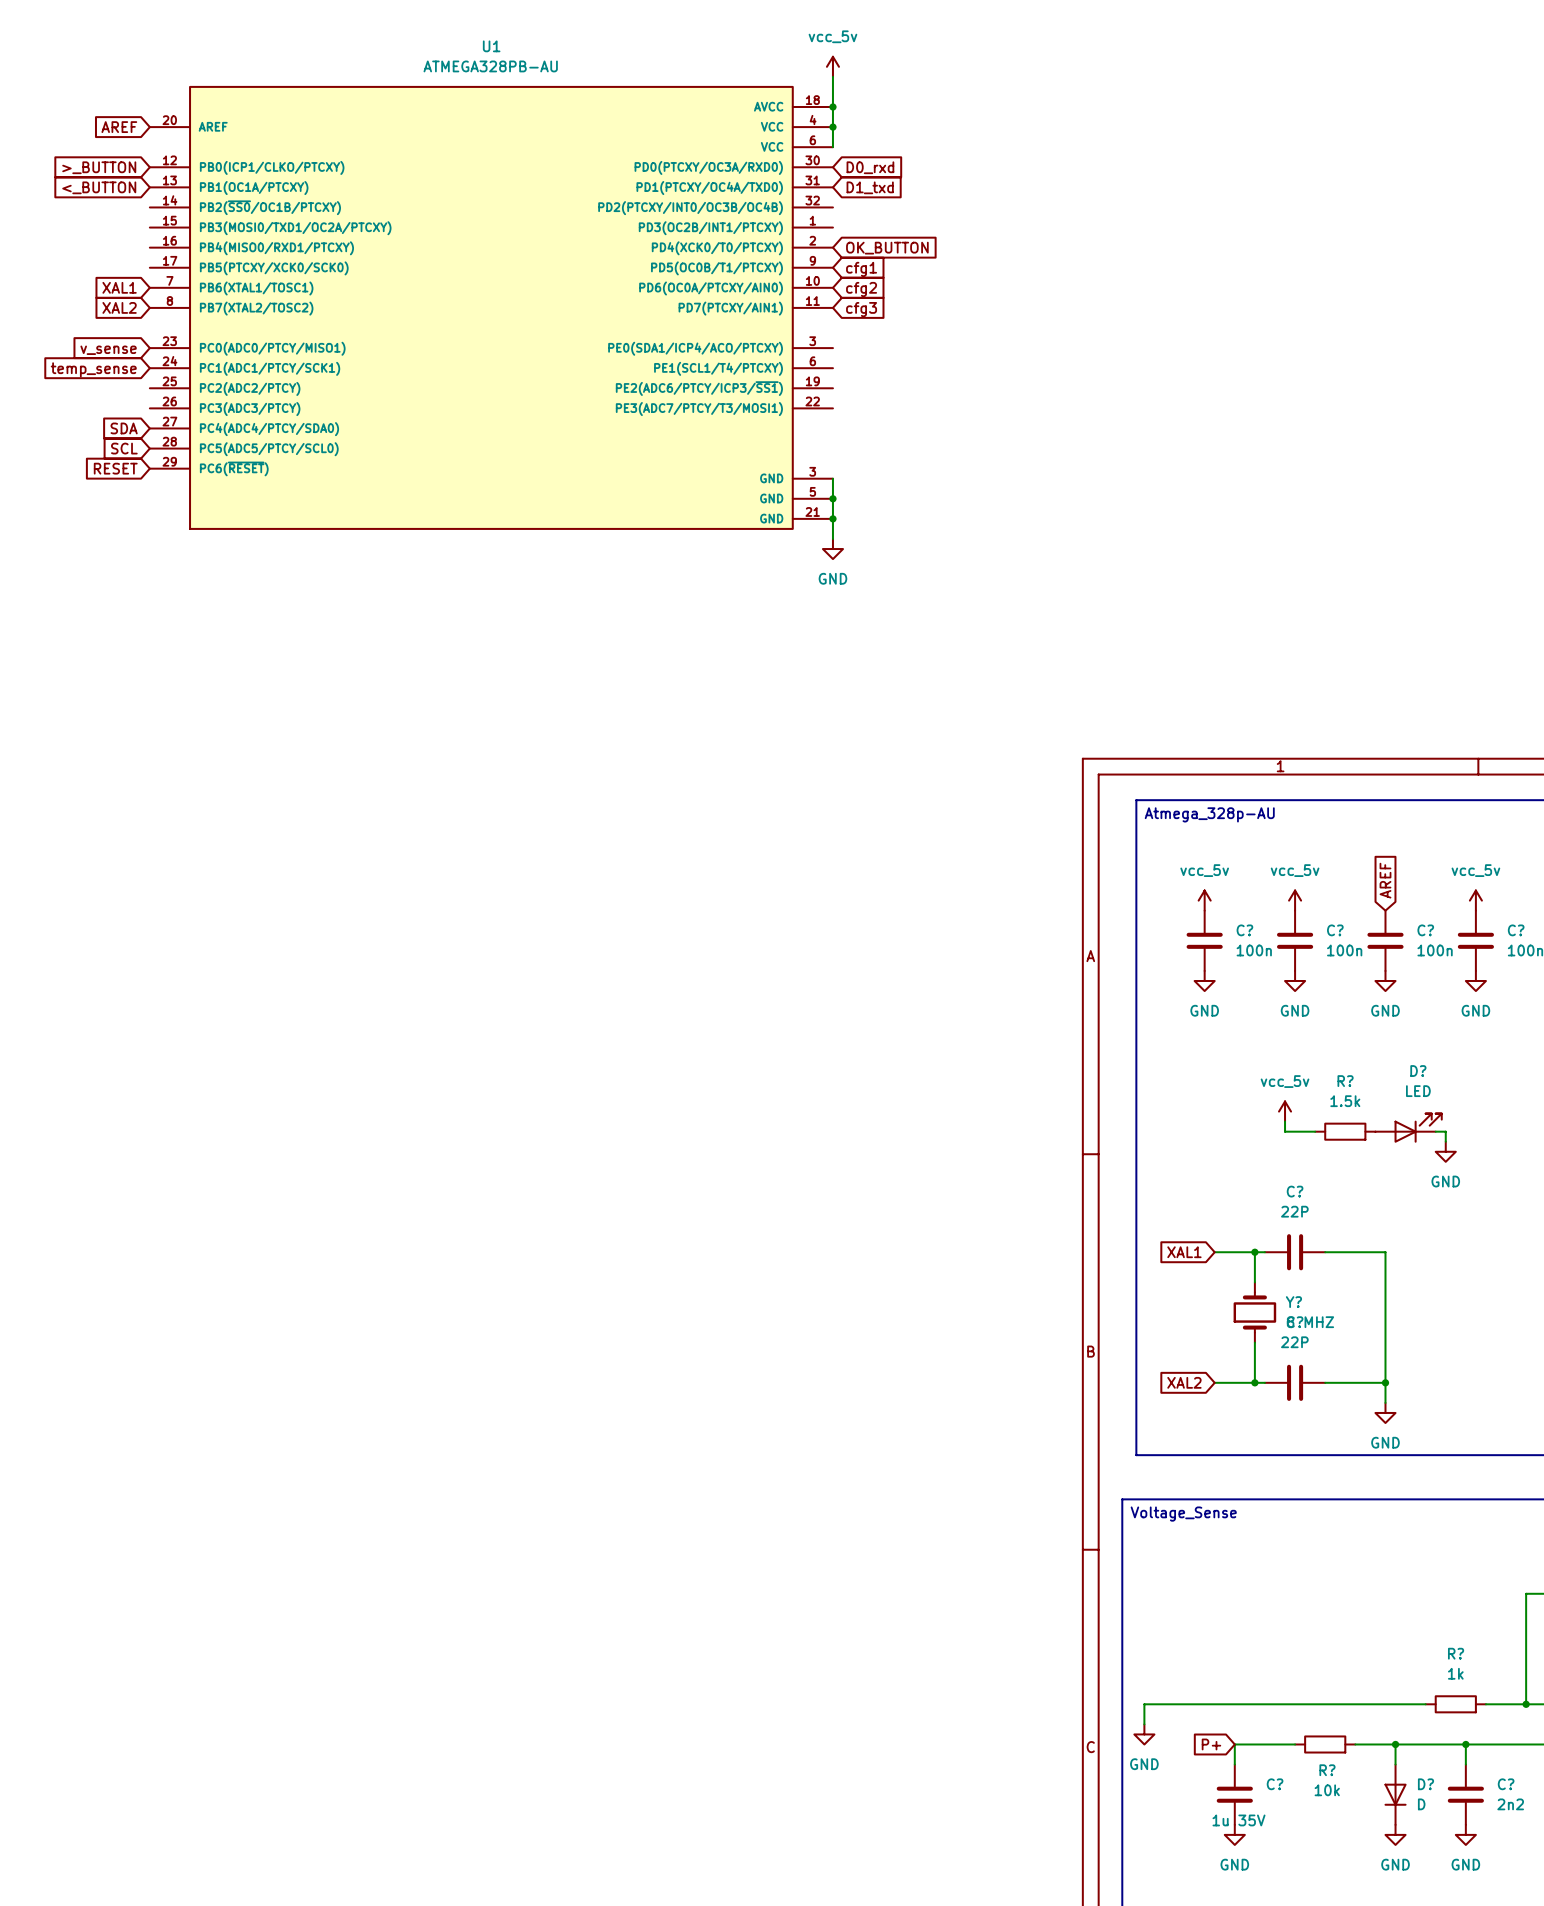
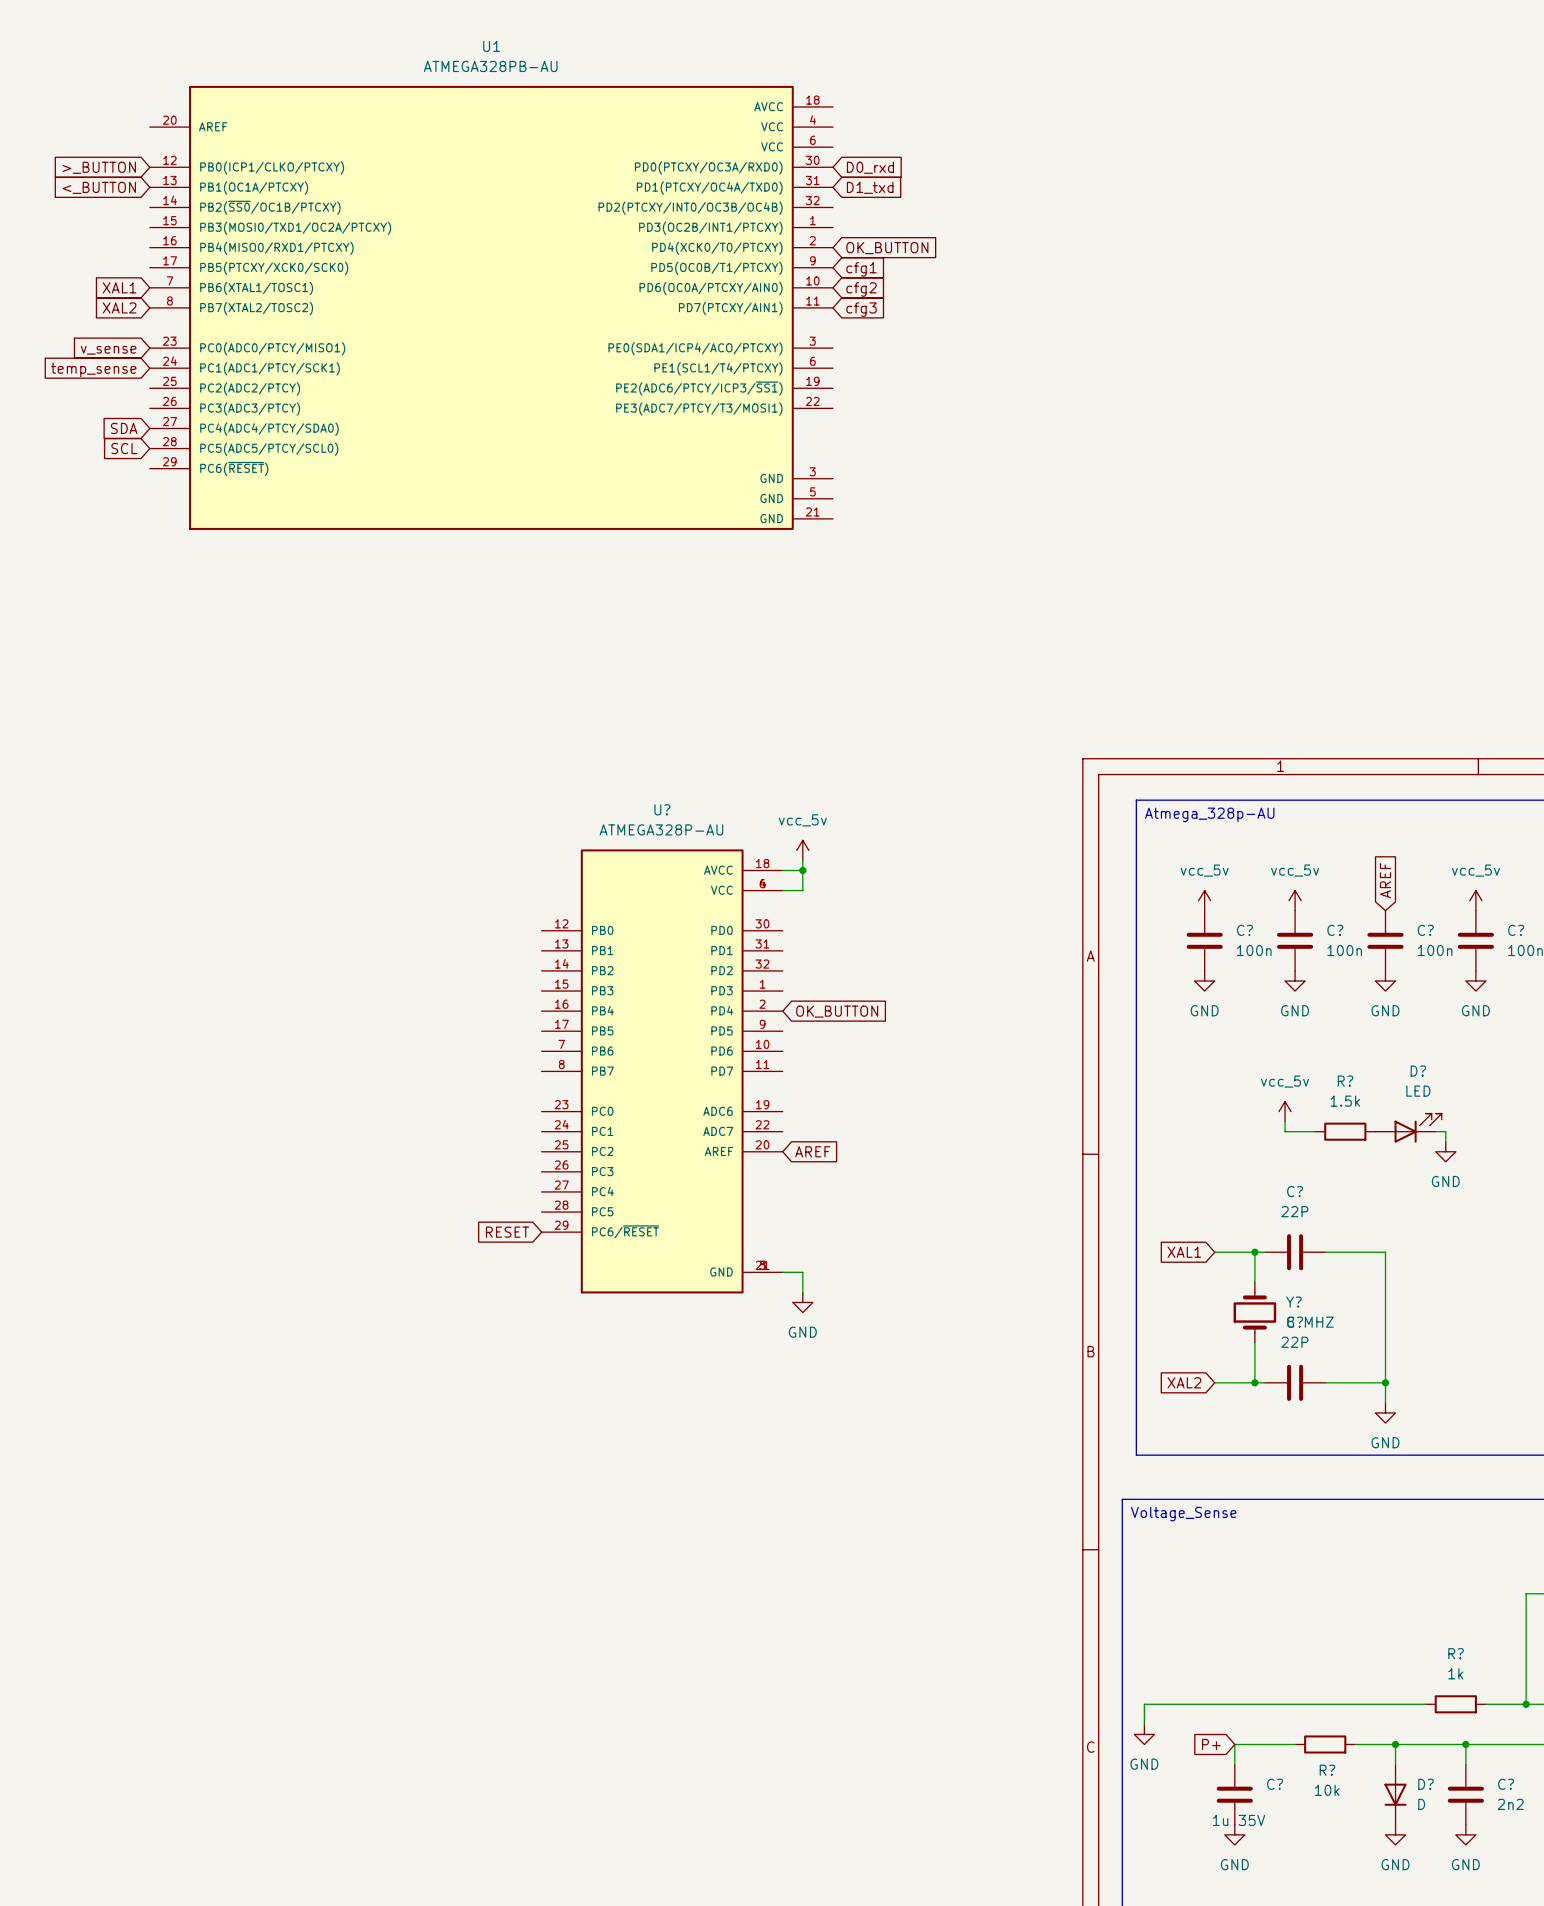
power symbol: vcc_5v (832, 66) -> none
wire: (832, 76) (832, 147) -> none
junction: (832, 107) -> none
global label: AREF (119, 127) -> none
junction: (832, 127) -> none
global label: RESET (115, 468) -> none
wire: (832, 478) (832, 538) -> none
junction: (832, 498) -> none
junction: (832, 518) -> none
power symbol: GND (832, 549) -> none
power symbol: none -> vcc_5v (802, 850)
wire: none -> (802, 860) (802, 890) (782, 890)
wire: none -> (782, 870) (802, 870)
junction: none -> (802, 870)
global label: none -> OK_BUTTON (837, 1011)
U?: none -> ATMEGA328P-AU (662, 1071)
global label: none -> AREF (812, 1151)
global label: none -> RESET (507, 1232)
wire: none -> (782, 1272) (802, 1272) (802, 1292)
power symbol: none -> GND (802, 1302)

